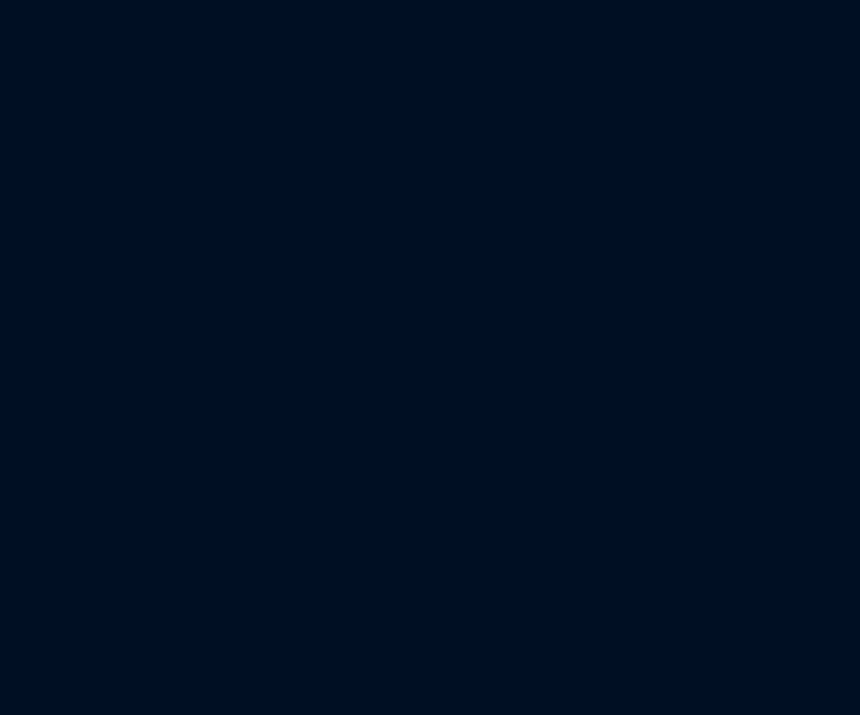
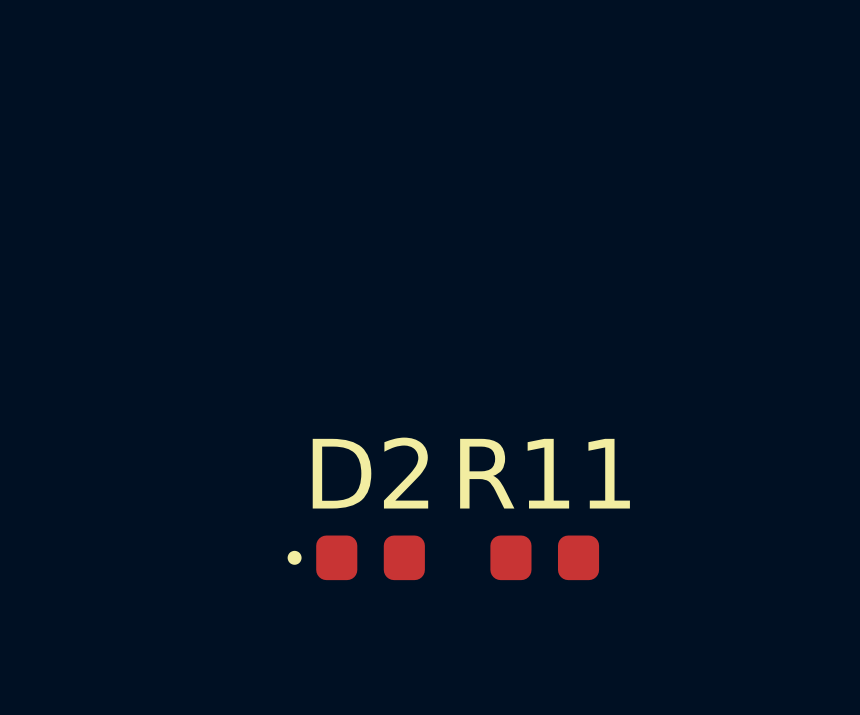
D2: none -> (356, 557)
R11: none -> (544, 557)

